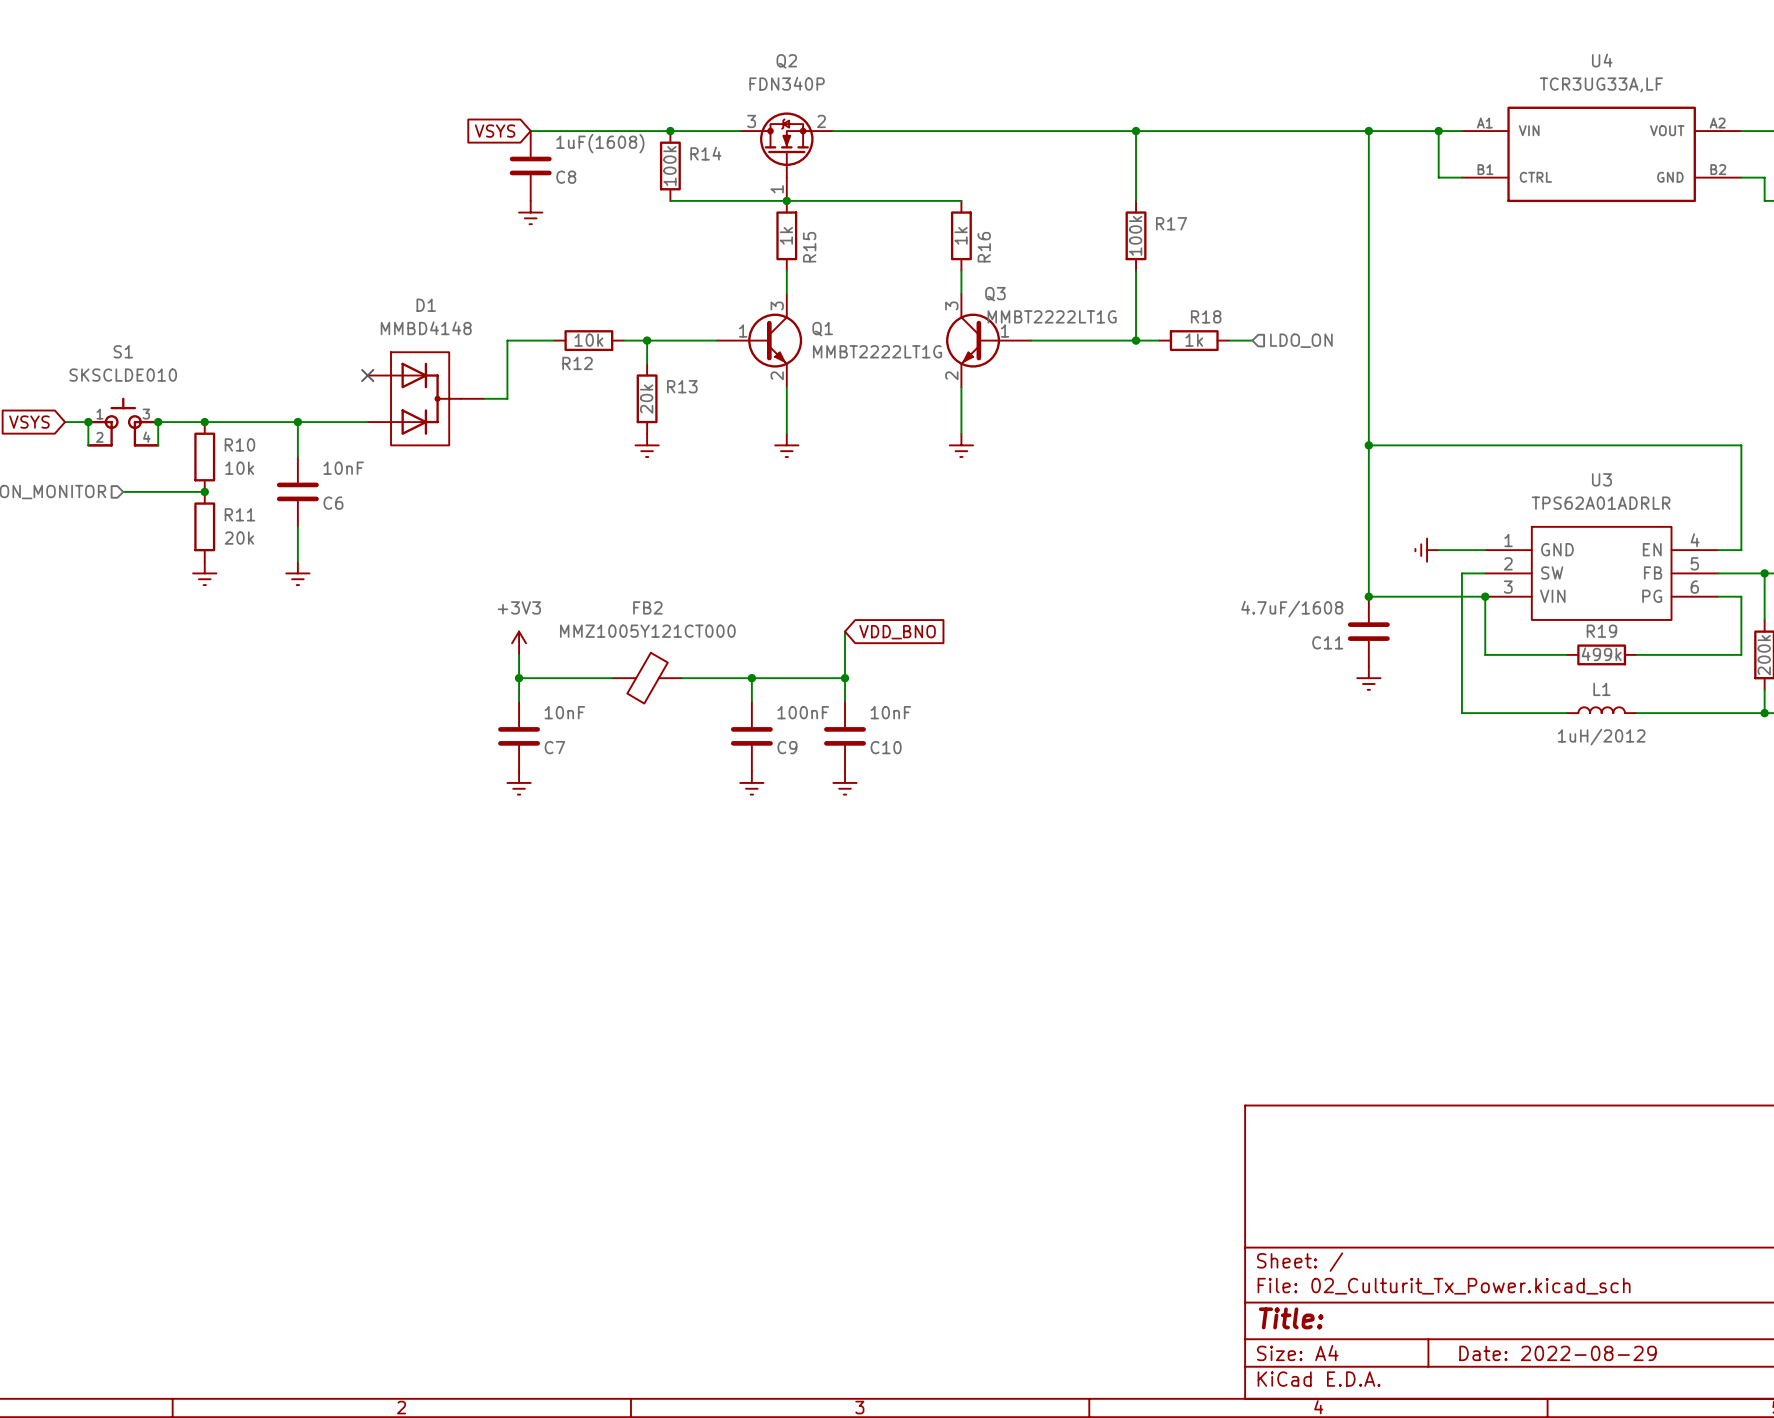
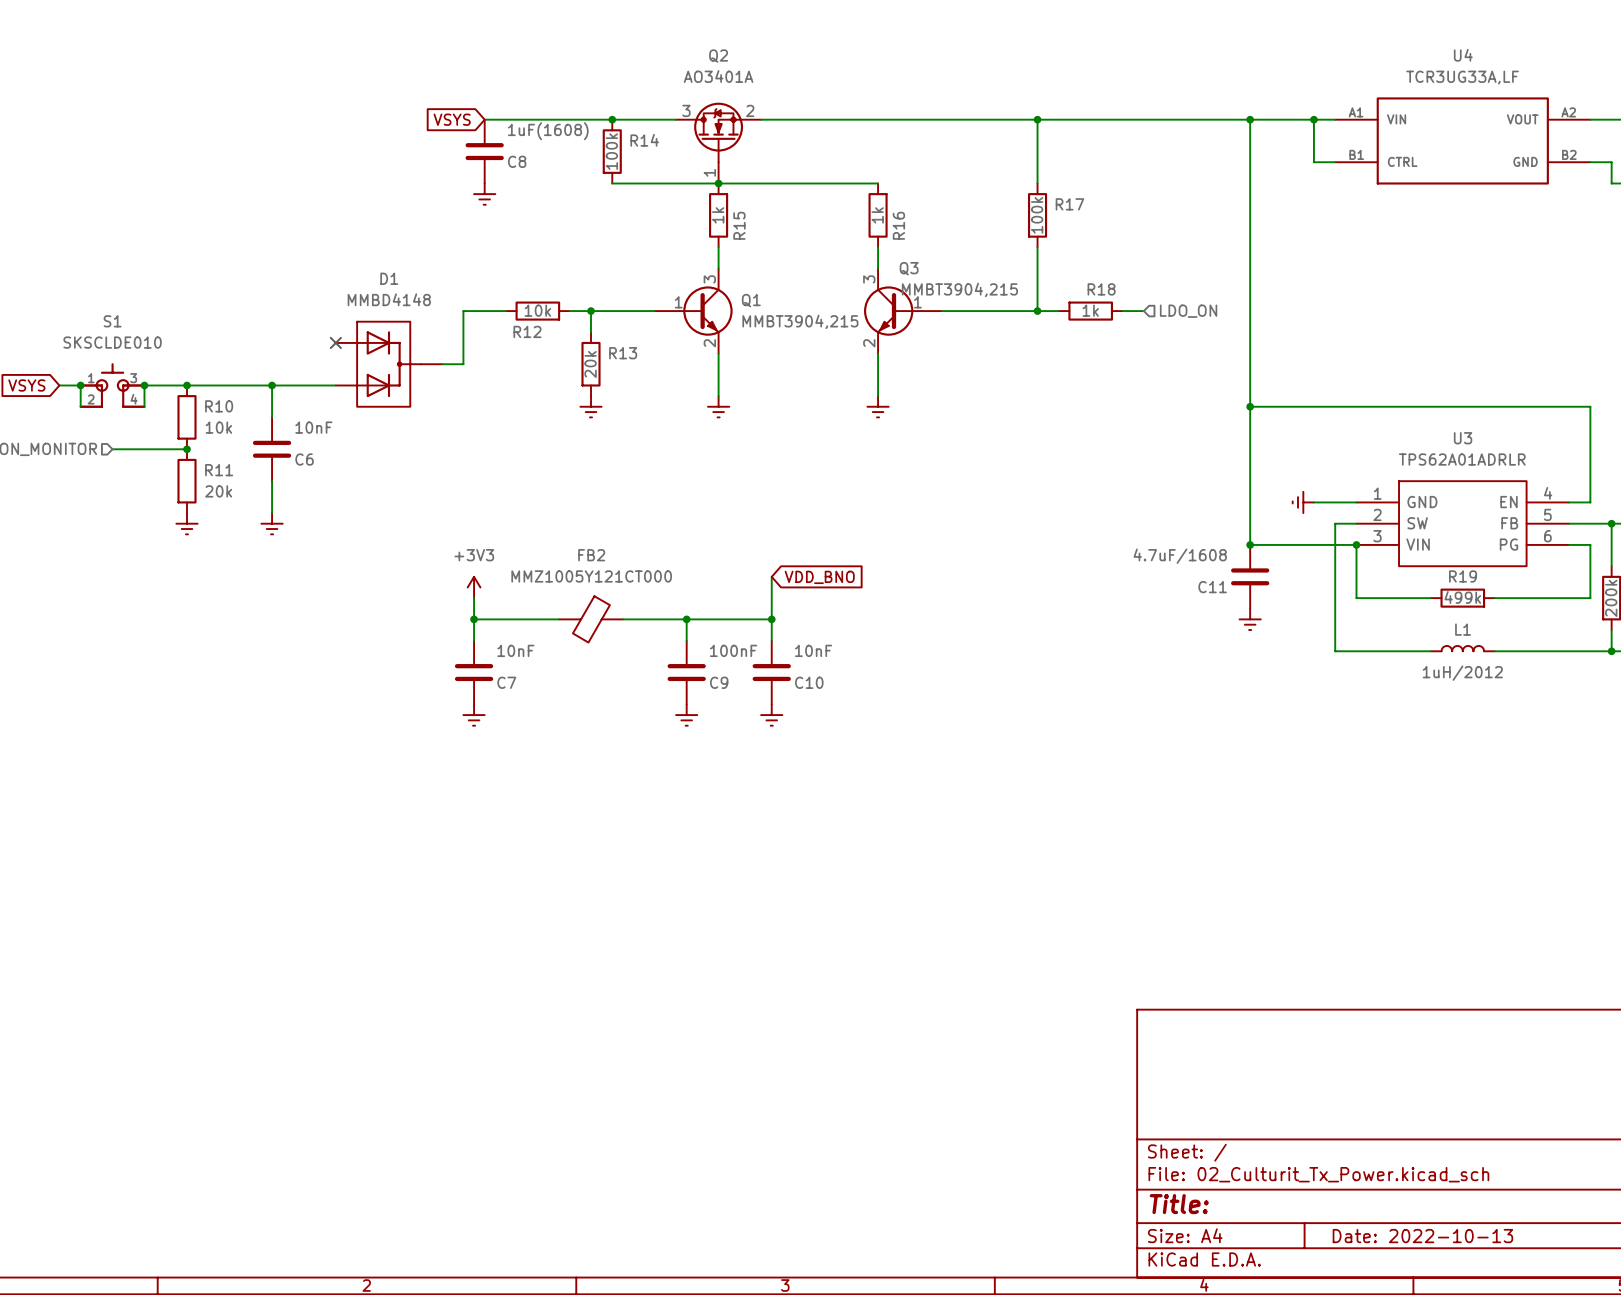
Q2 value: FDN340P (787, 83) -> AO3401A (718, 76)
Q3 value: MMBT2222LT1G (1052, 316) -> MMBT3904,215 (959, 289)
Q1 value: MMBT2222LT1G (877, 351) -> MMBT3904,215 (800, 321)
title block: Date: 2022-08-29 (1558, 1353) -> Date: 2022-10-13 (1422, 1236)

